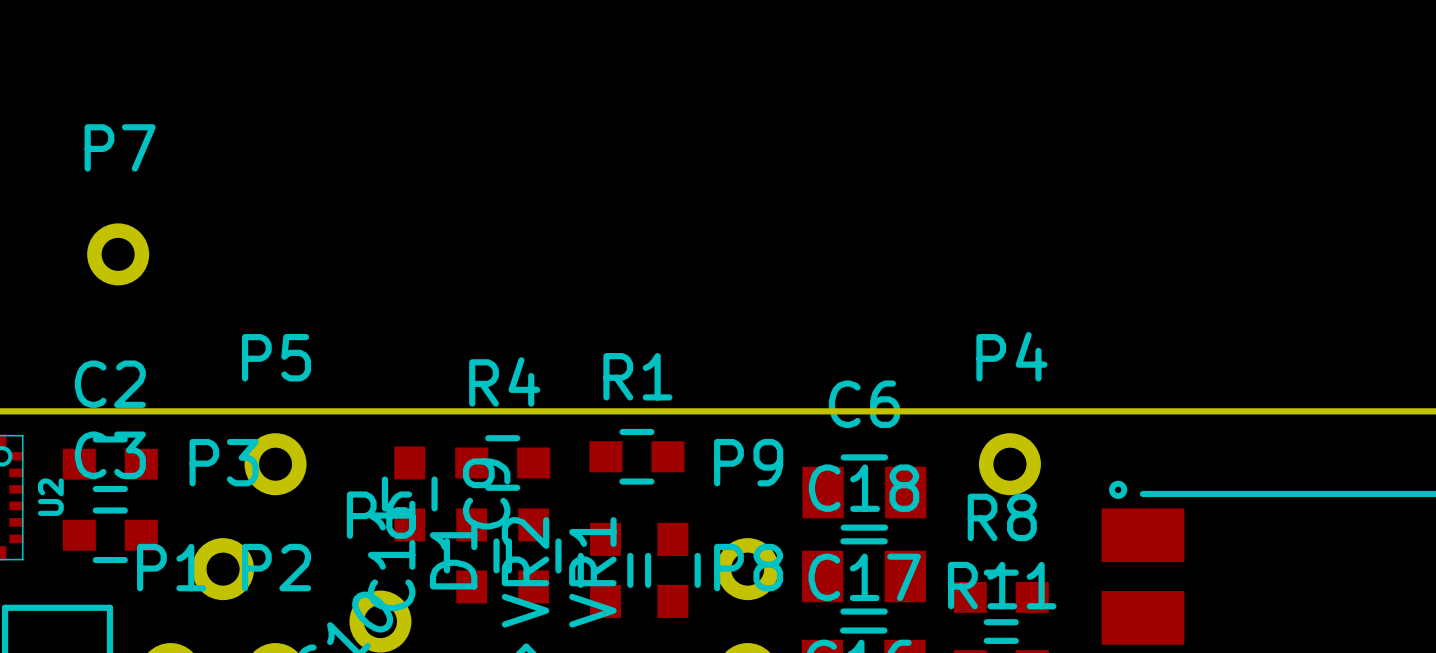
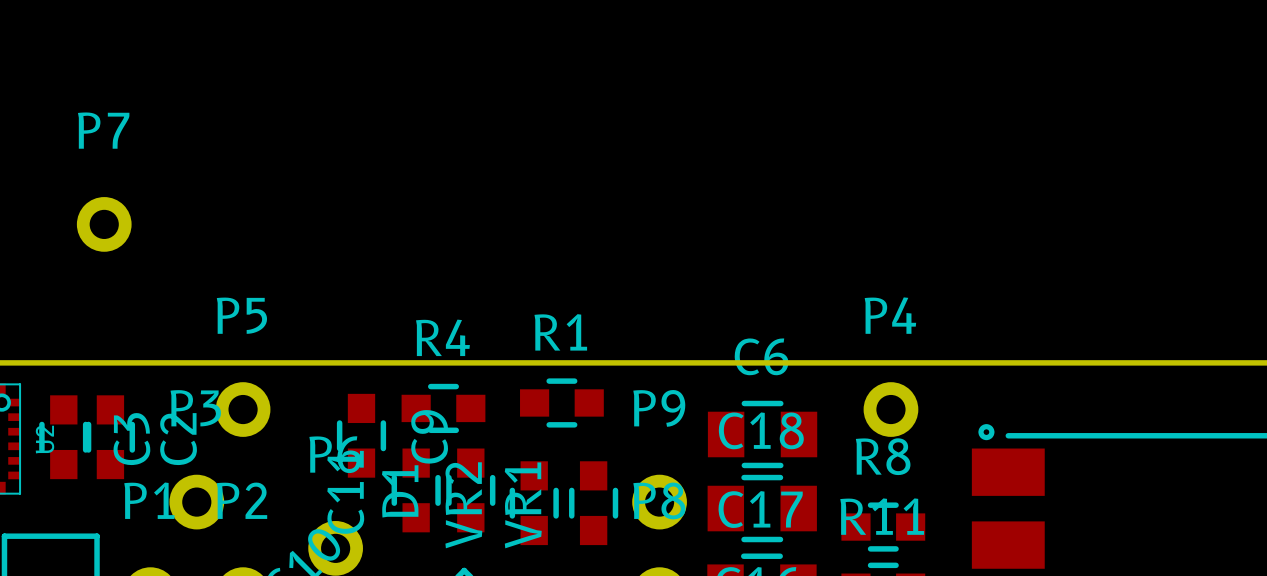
C2 rotation: 0° (110, 464) -> 90° clockwise (110, 437)
C3 rotation: 0° (110, 535) -> 90° clockwise (63, 437)

